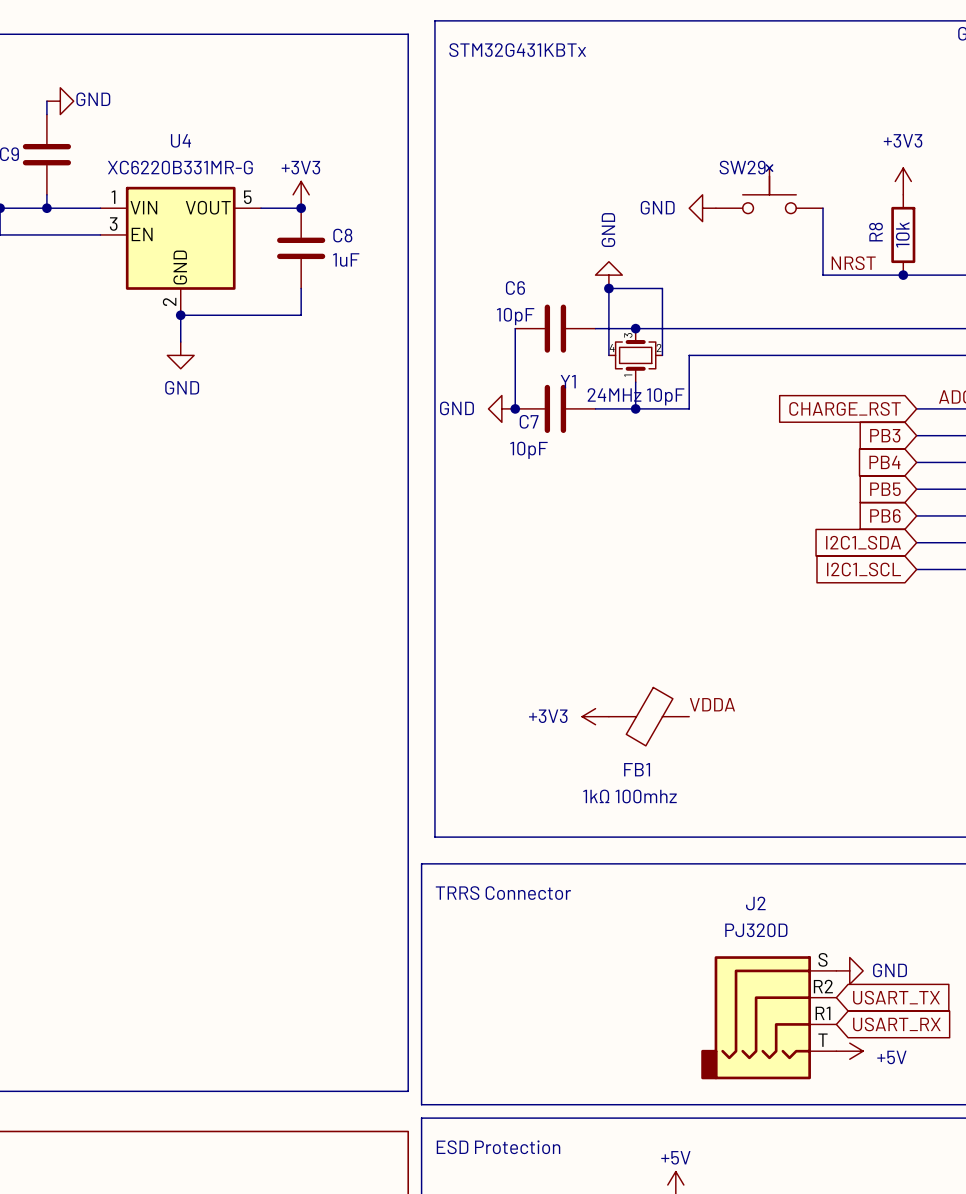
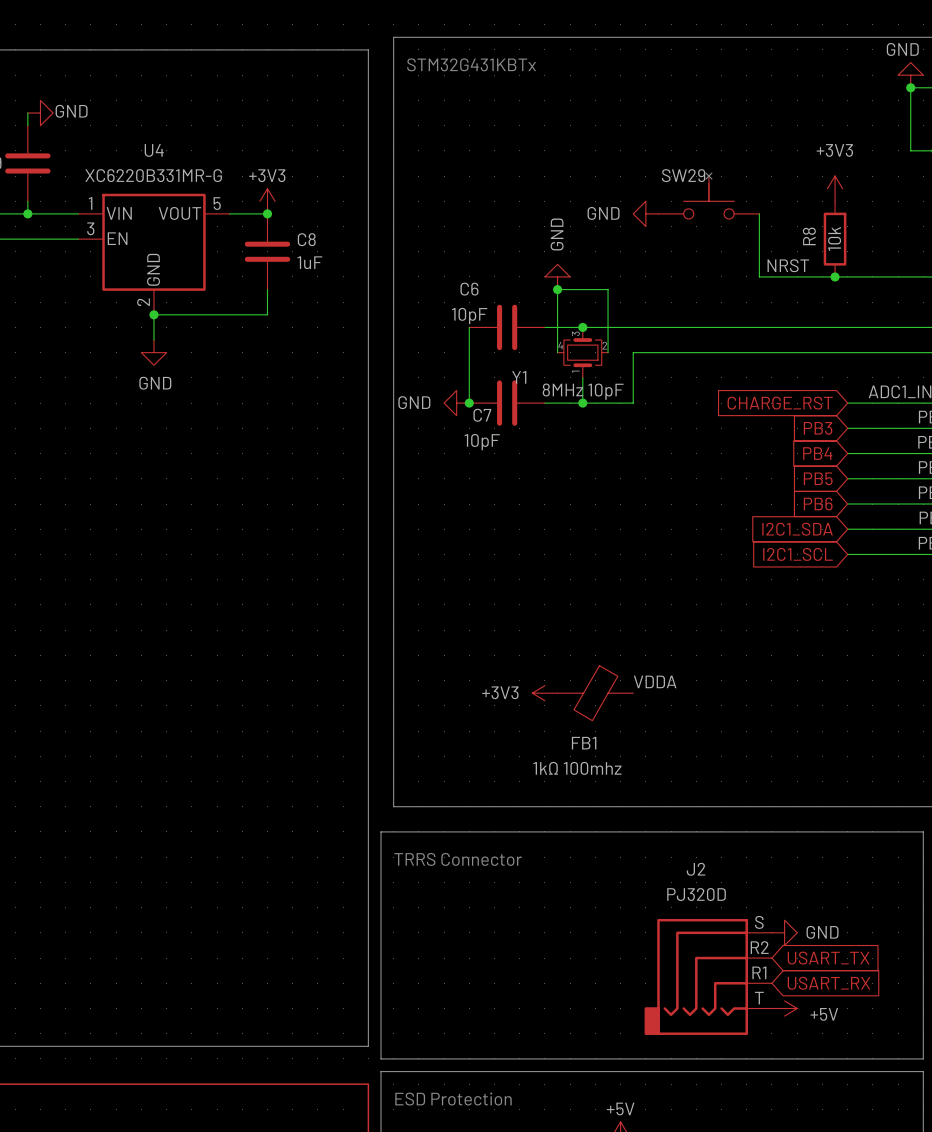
Y1 value: 24MHz 10pF (636, 396) -> 8MHz 10pF (583, 391)

